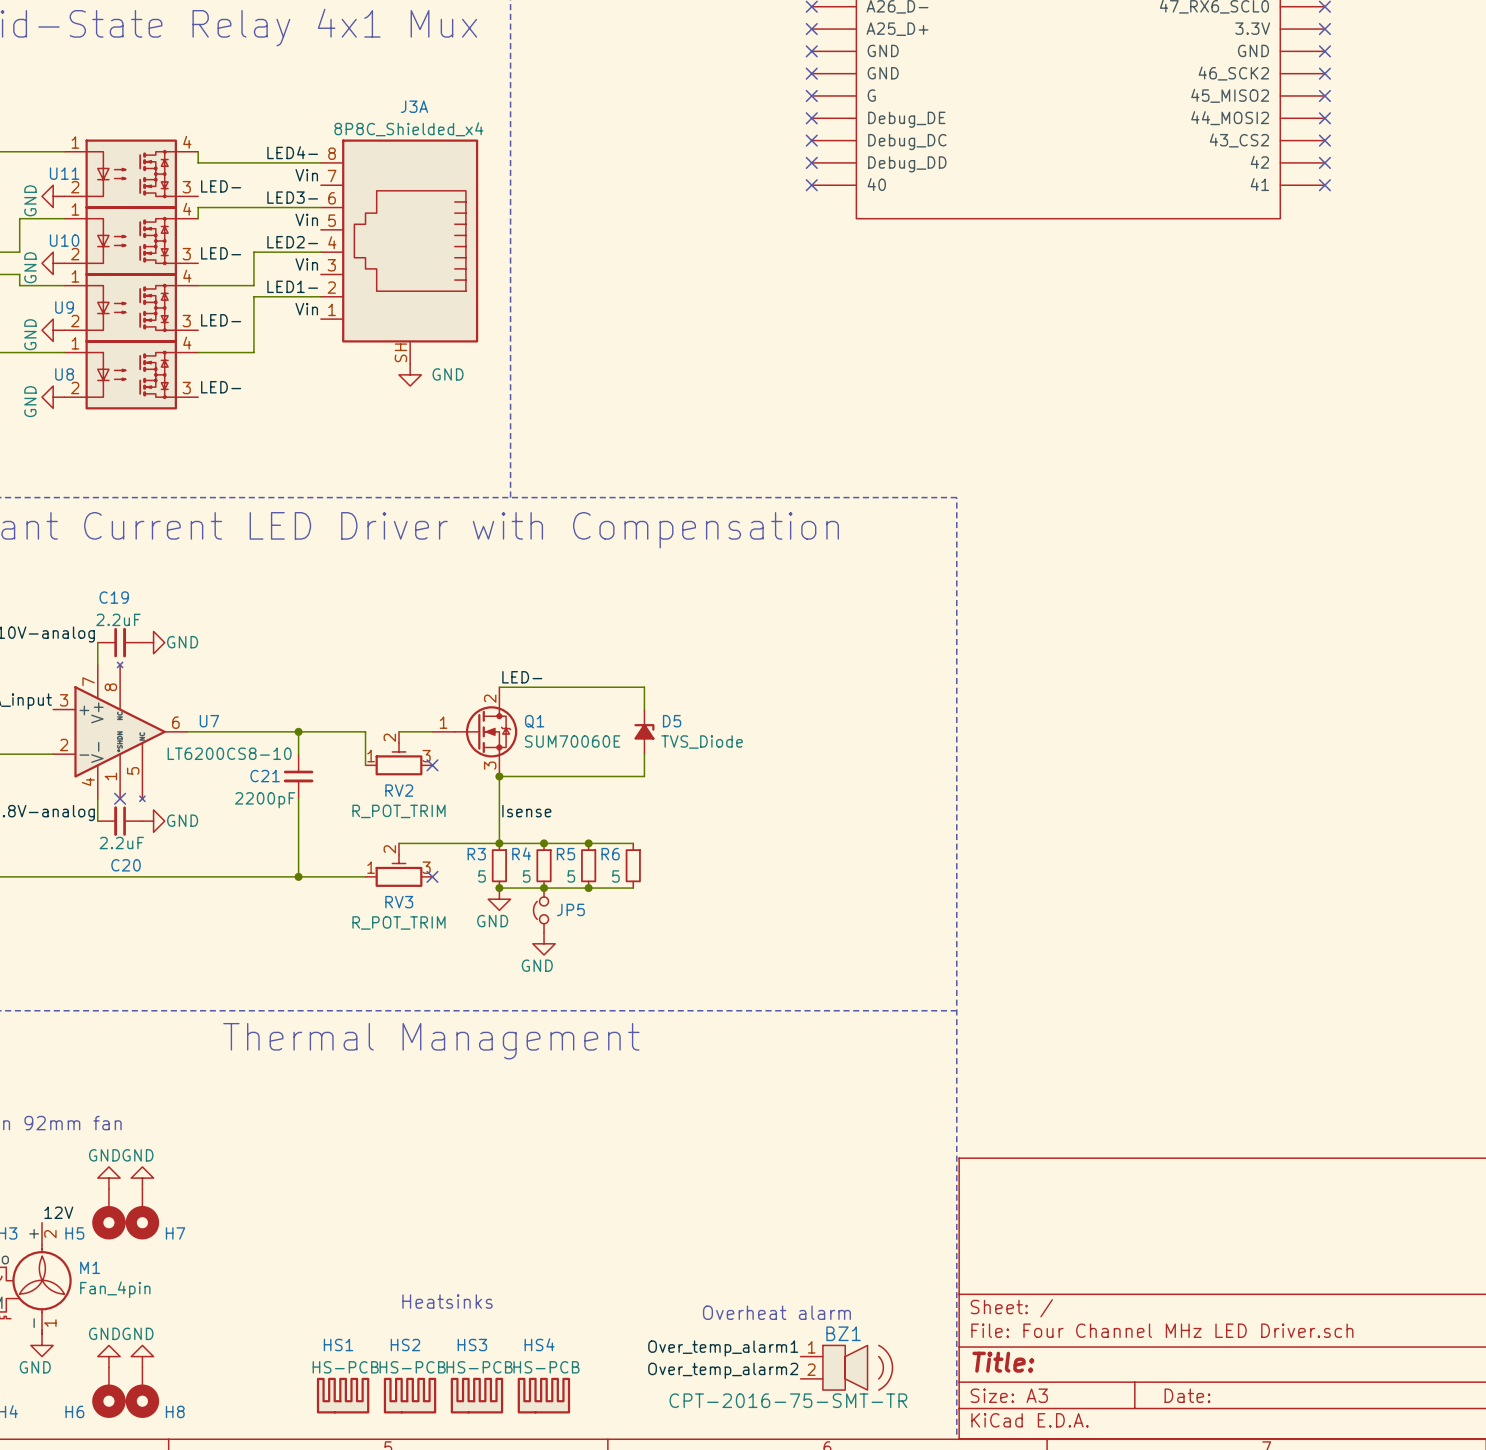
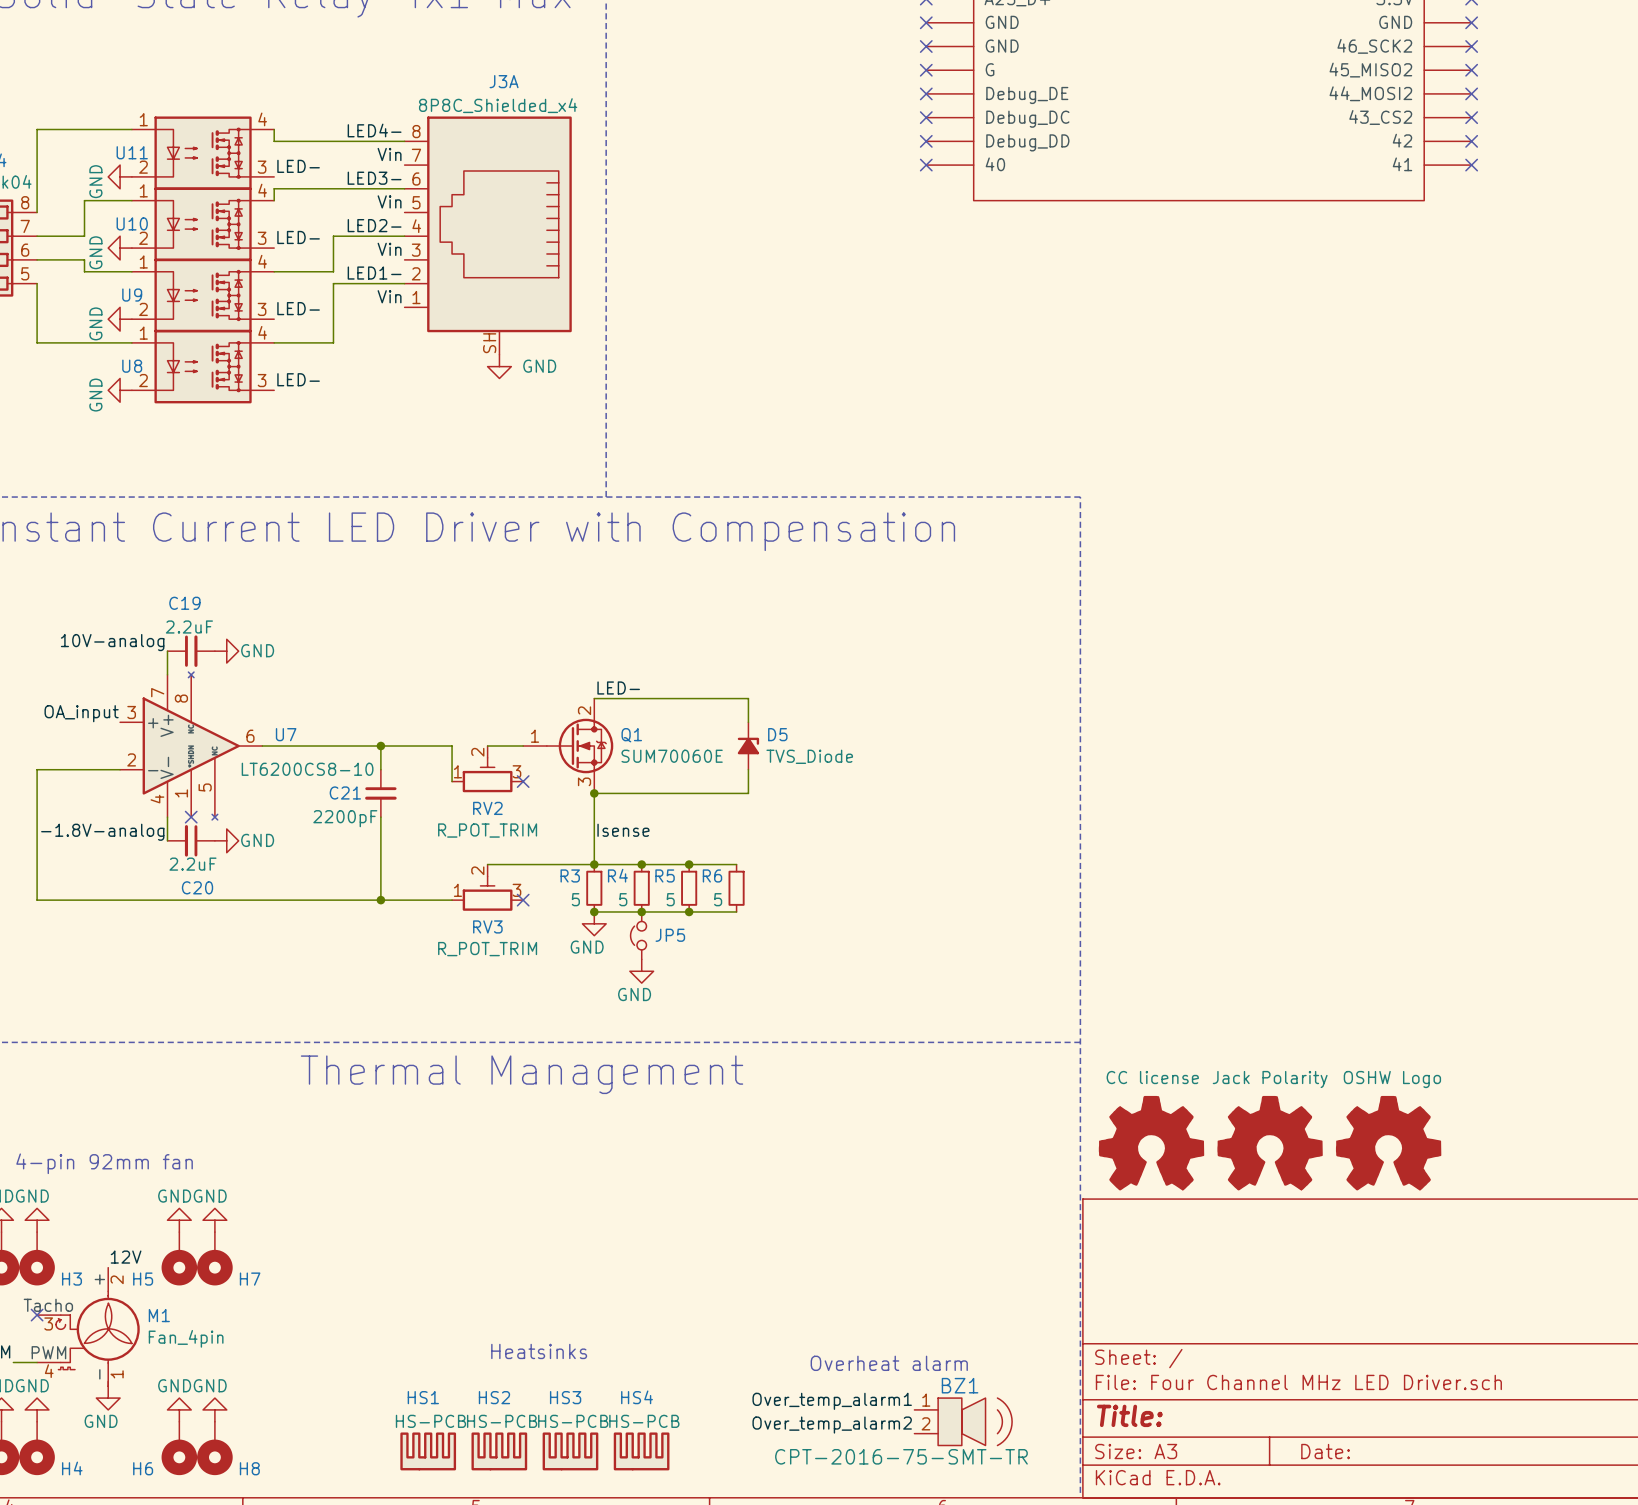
part: none -> CC license (1151, 1143)
part: none -> Jack Polarity (1270, 1143)
part: none -> OSHW Logo (1388, 1143)

